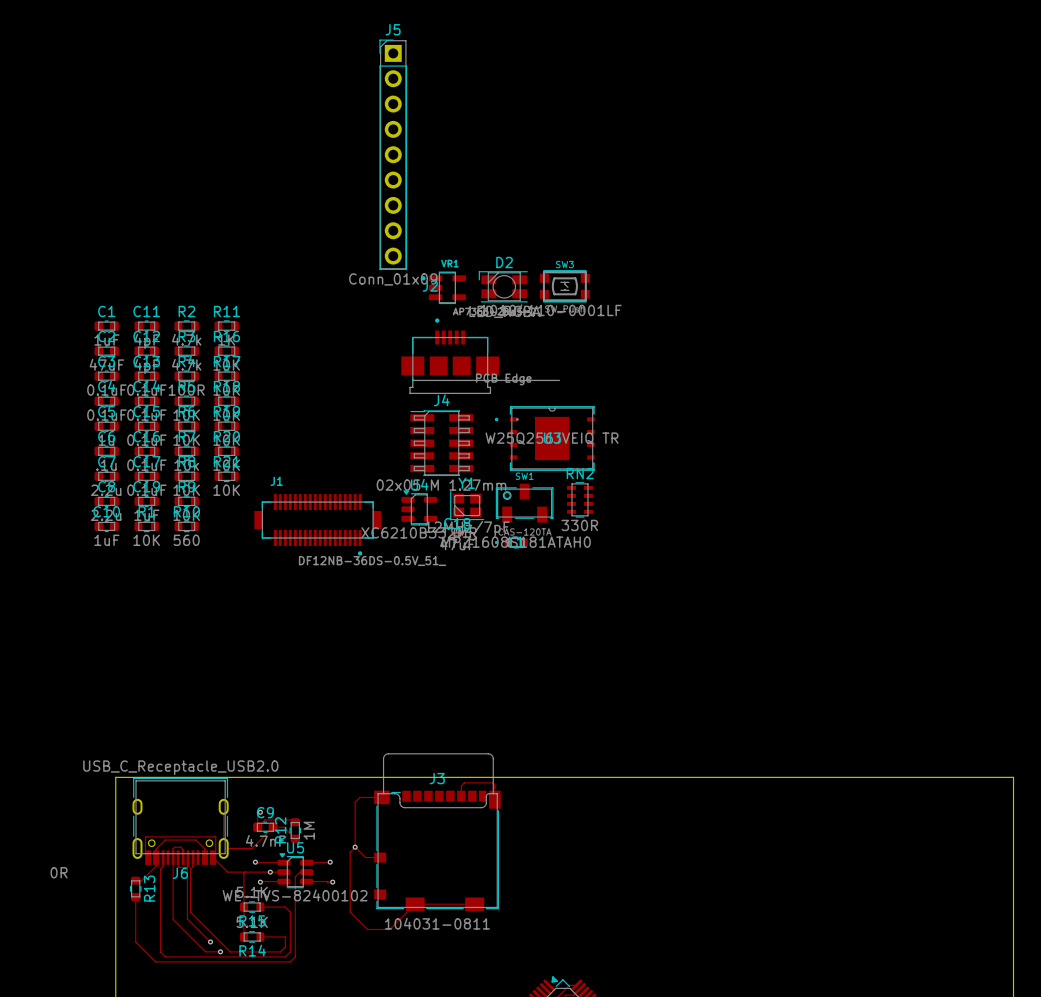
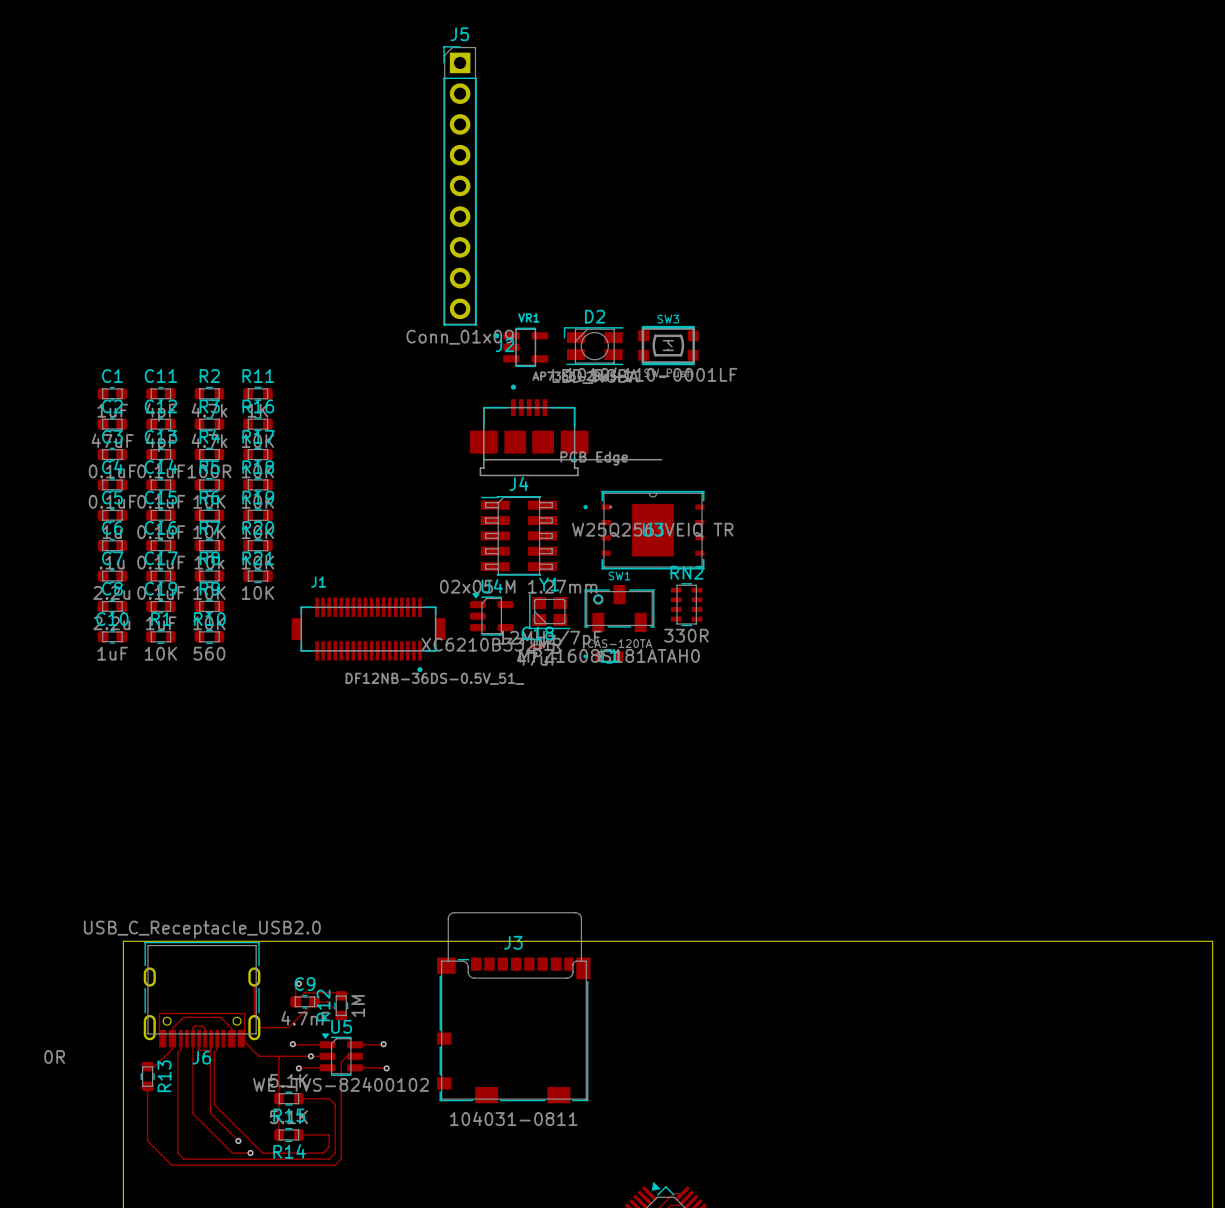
top track: (461, 796) (461, 785) (464, 782) (492, 782) (494, 784) (494, 799) -> none
top track: (381, 797) (360, 797) (355, 802) (355, 847) -> none
top track: (355, 847) (350, 852) (350, 912) (367, 929) (389, 929) (415, 904) (474, 904) -> none
top track: (355, 847) (365, 857) (380, 857) -> none
via: (355, 847) -> none

